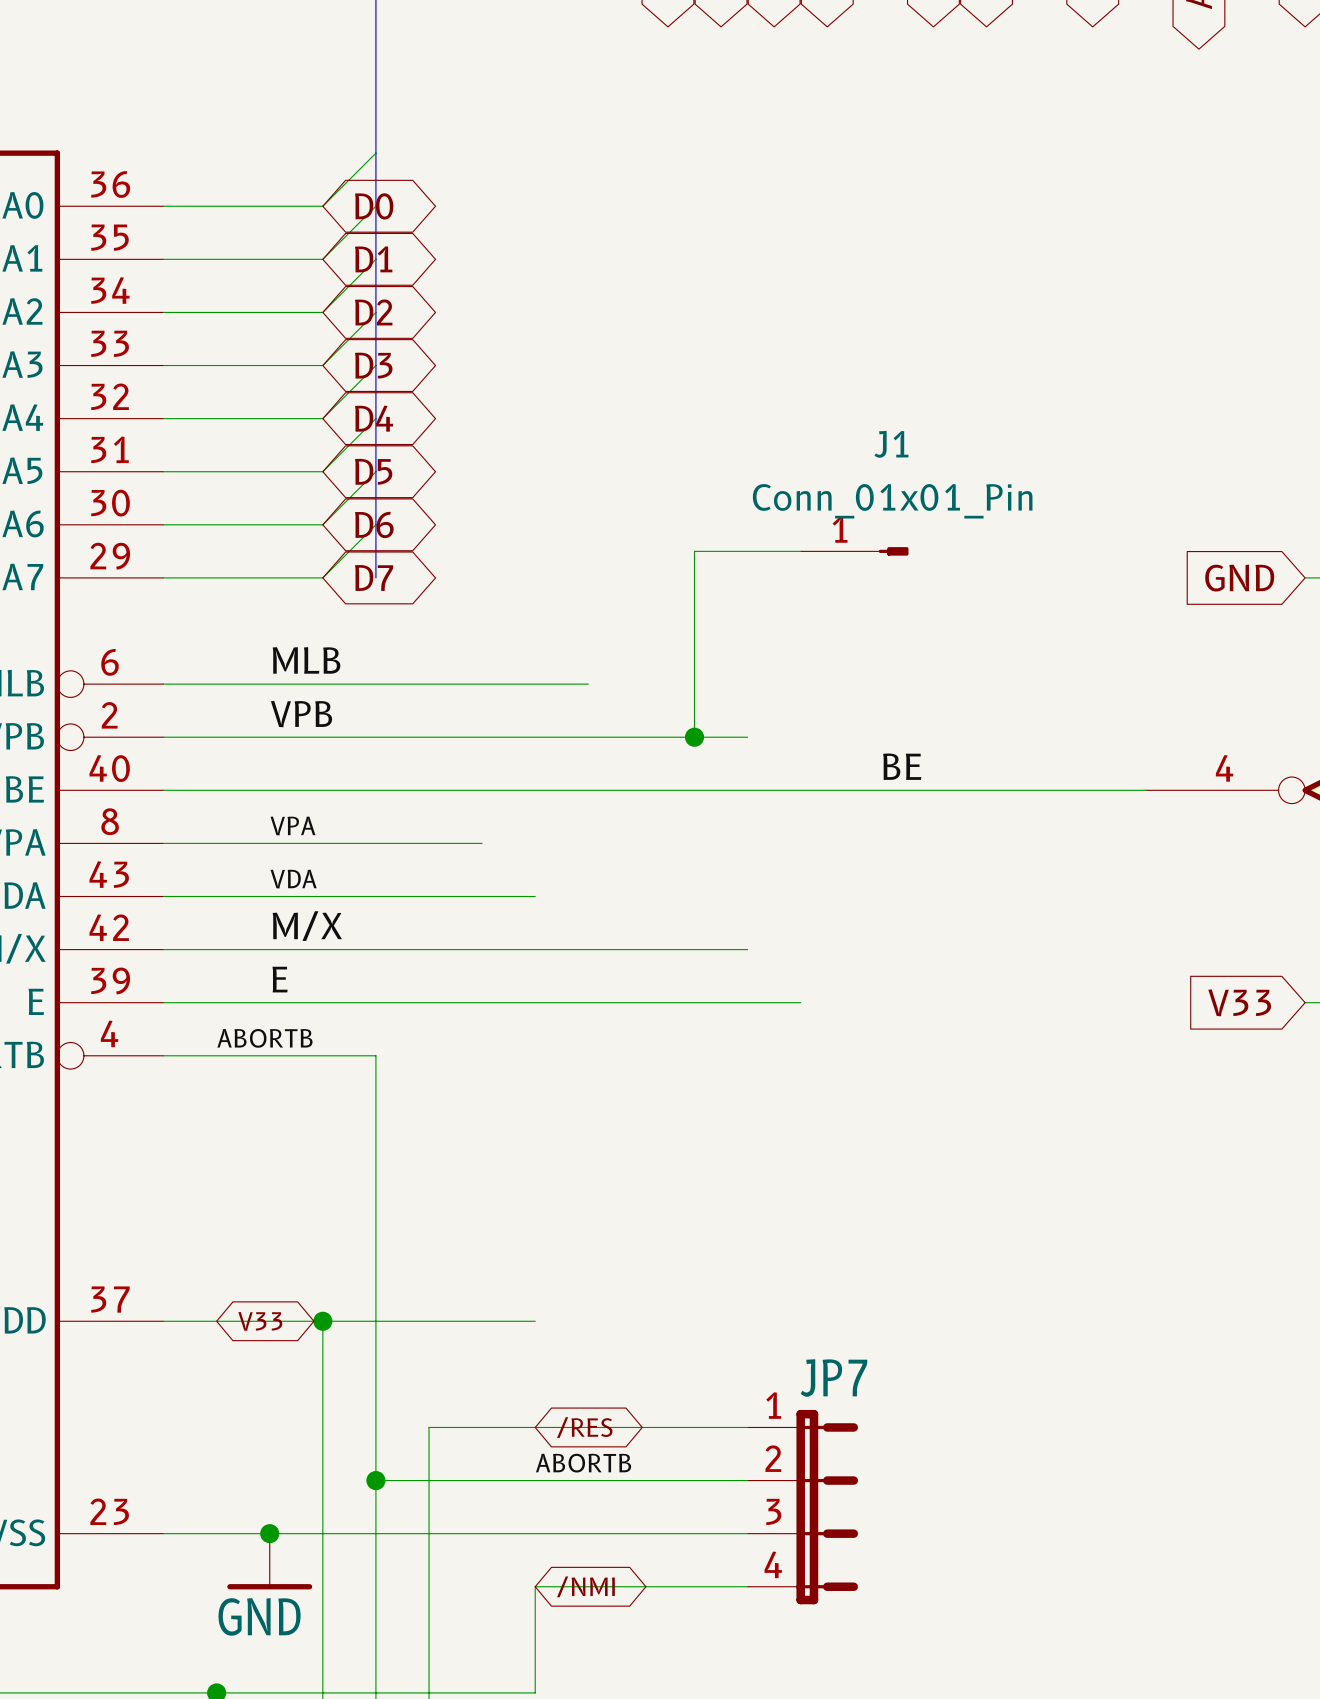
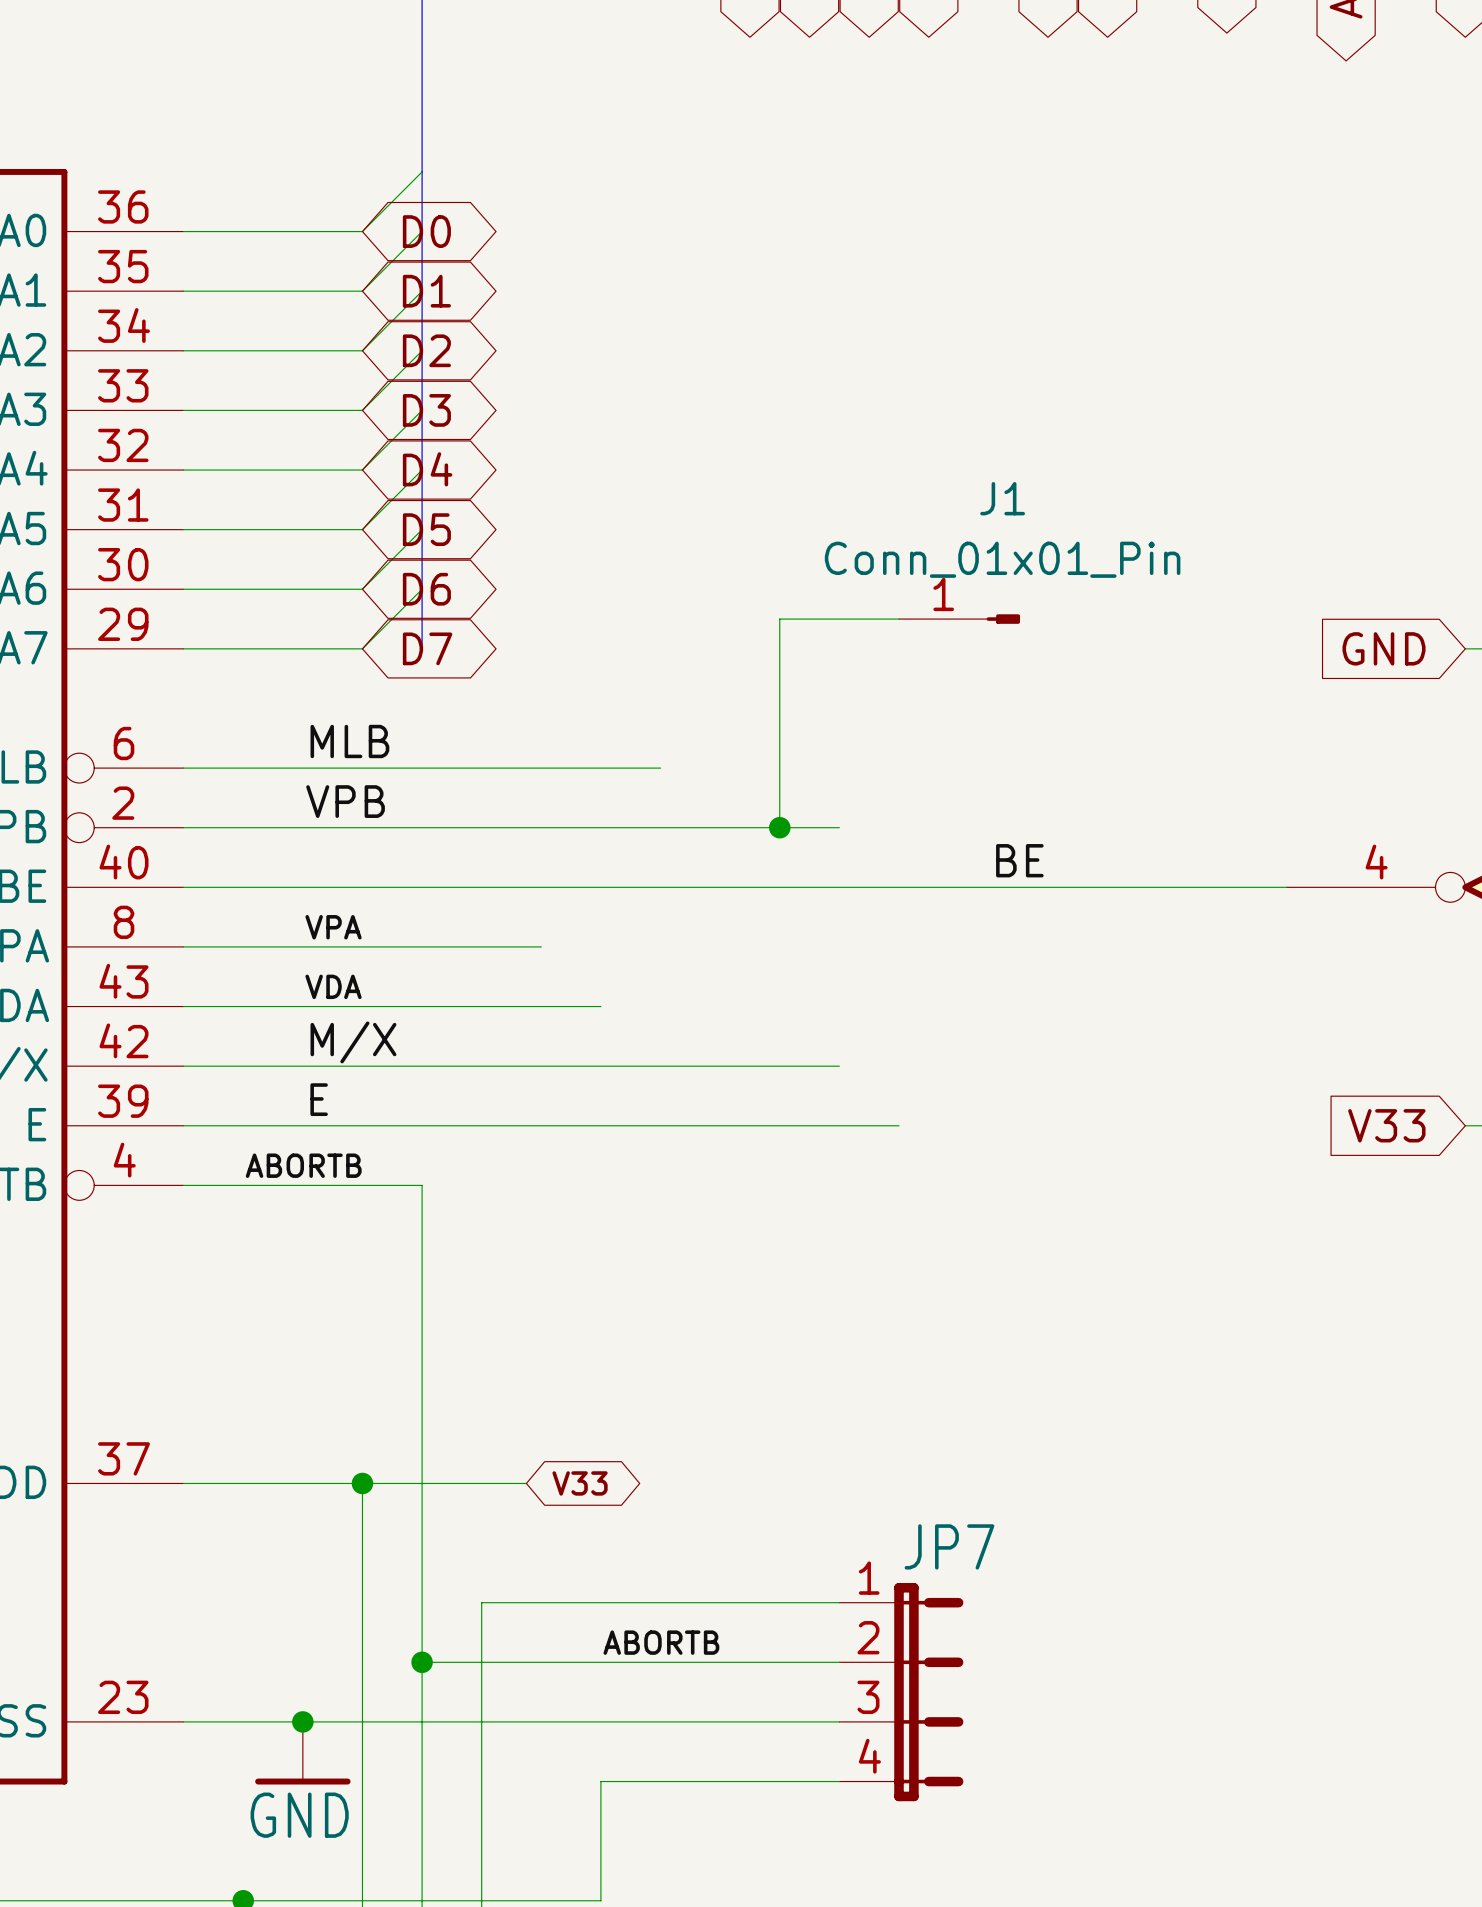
global label position: V33 (260, 1321) -> V33 (580, 1483)
wire: (468, 1321) (535, 1321) -> none
global label: /RES (584, 1427) -> none
global label: /NMI (585, 1586) -> none

